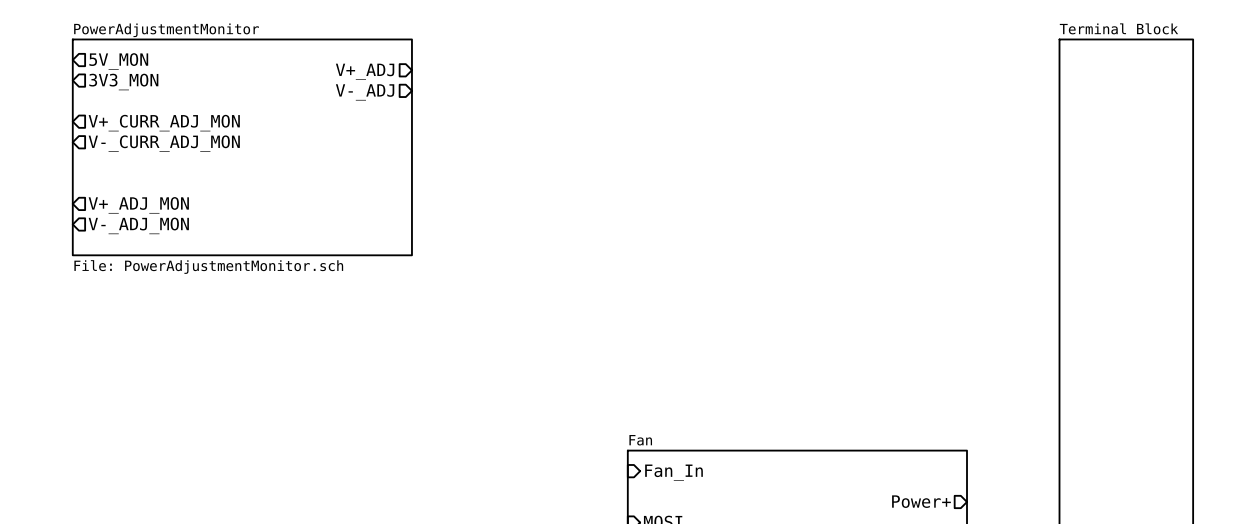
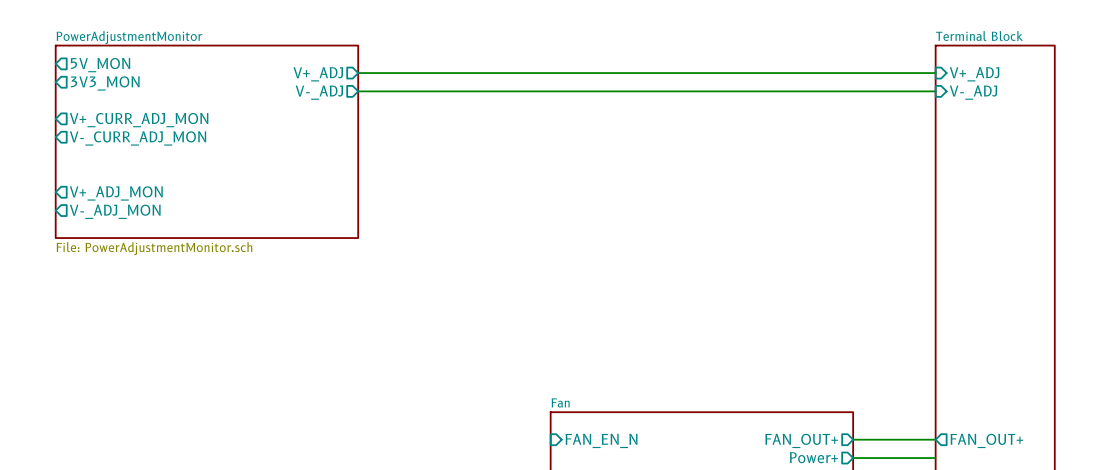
wire: none -> (358, 73) (935, 73)
sheet pin: none -> V+_ADJ (974, 74)
wire: none -> (358, 91) (935, 91)
sheet pin: none -> V-_ADJ (973, 92)
sheet pin: Fan_In (674, 472) -> none
wire: none -> (853, 439) (935, 439)
sheet pin: none -> FAN_EN_N (601, 440)
sheet pin: none -> FAN_OUT+ (801, 440)
sheet pin: none -> FAN_OUT+ (986, 440)
wire: none -> (853, 458) (935, 458)

